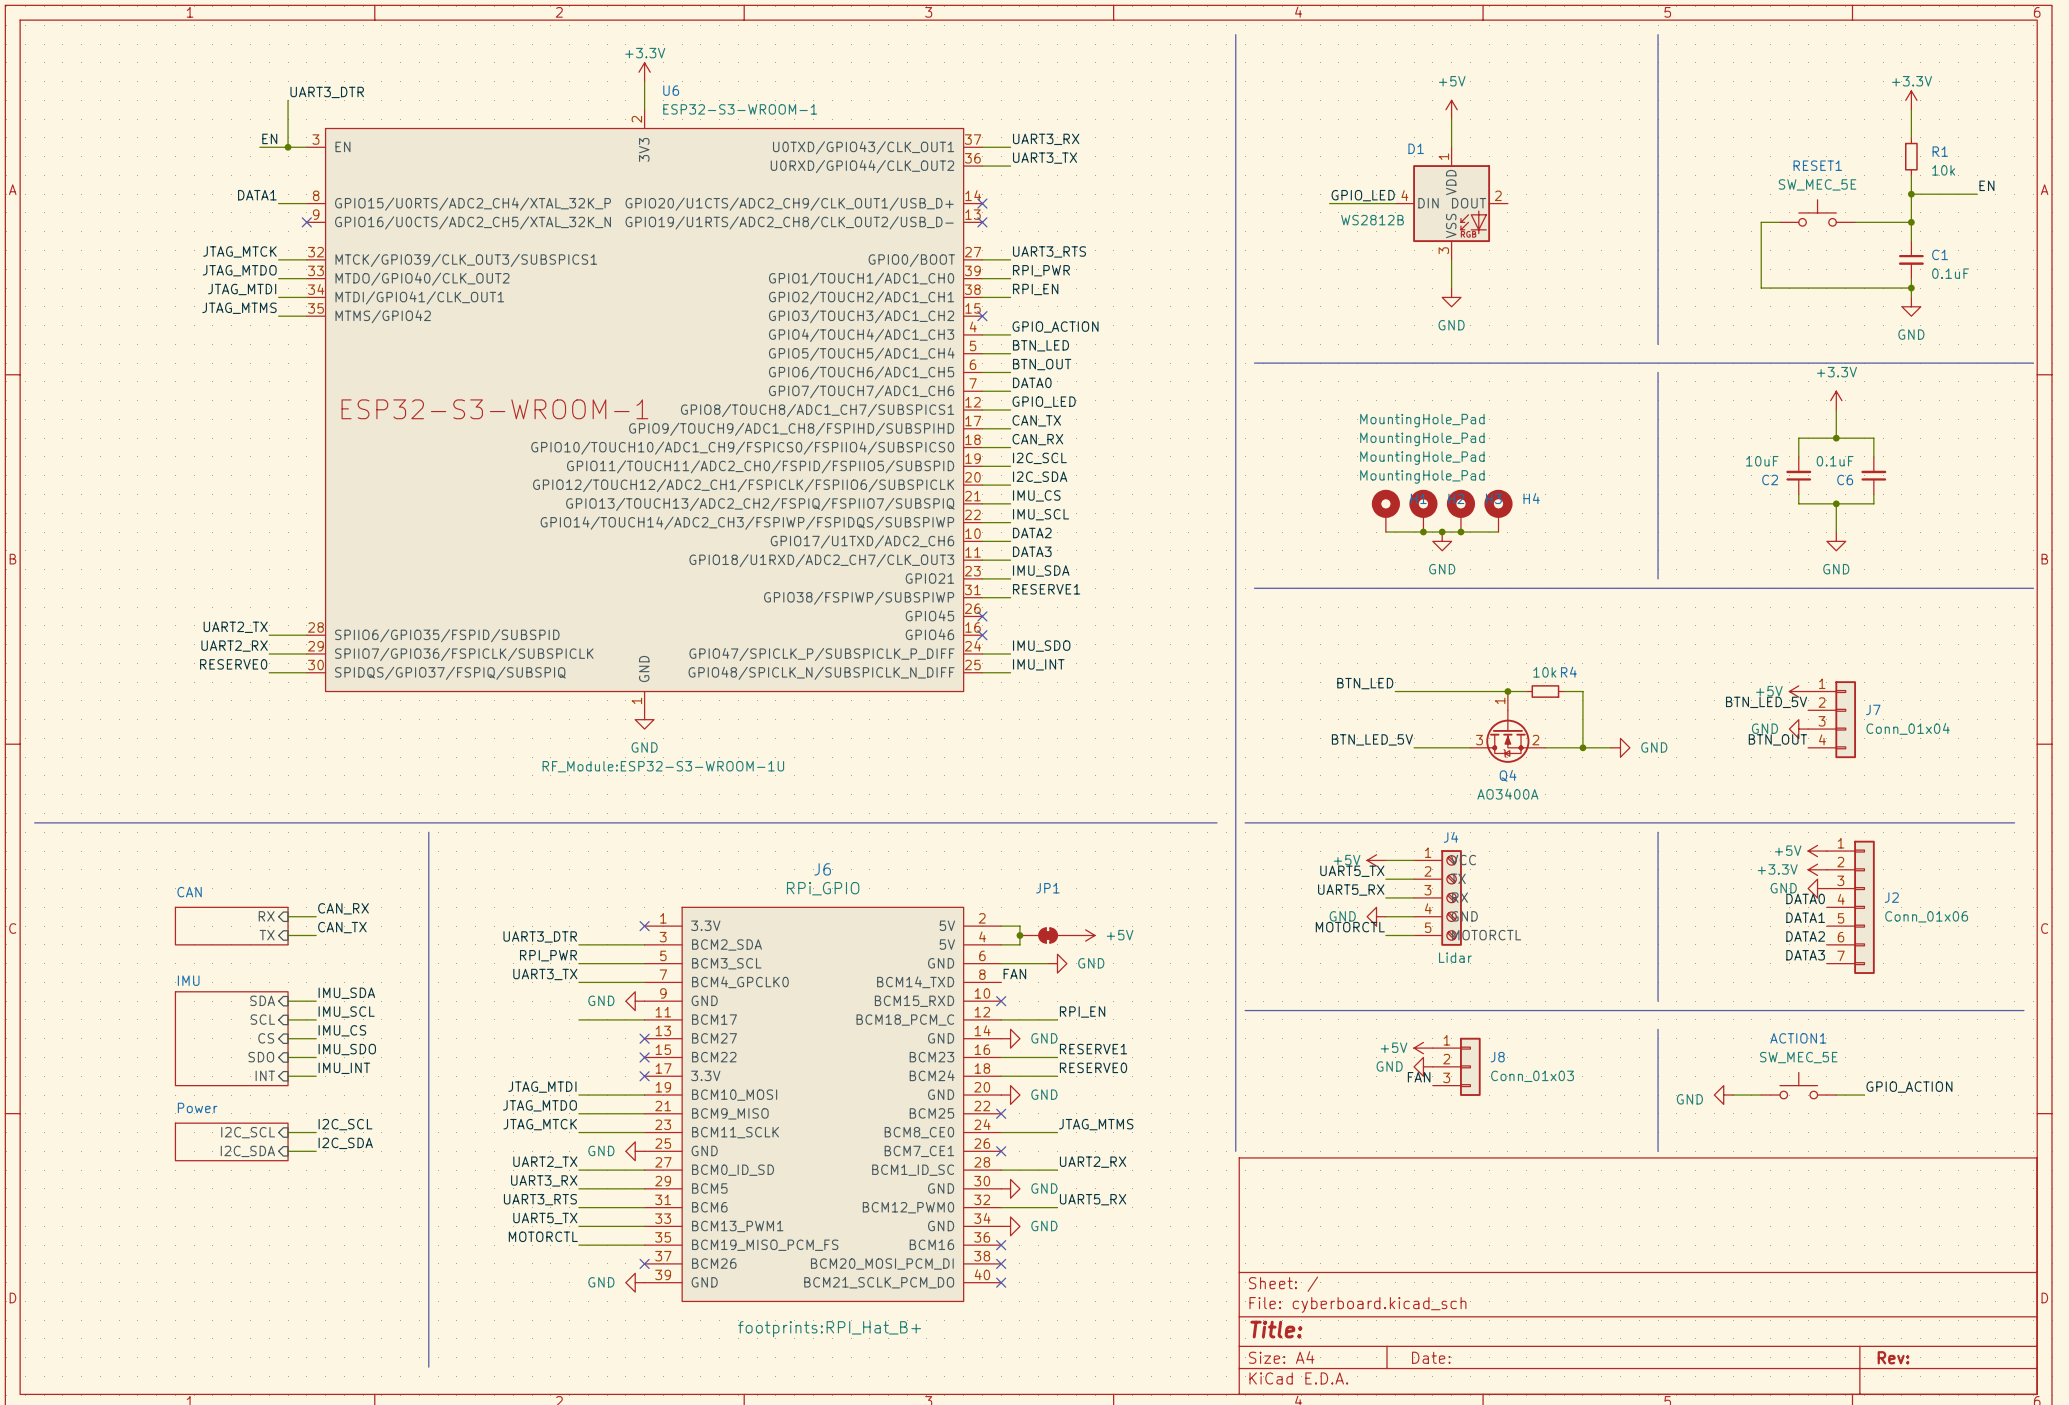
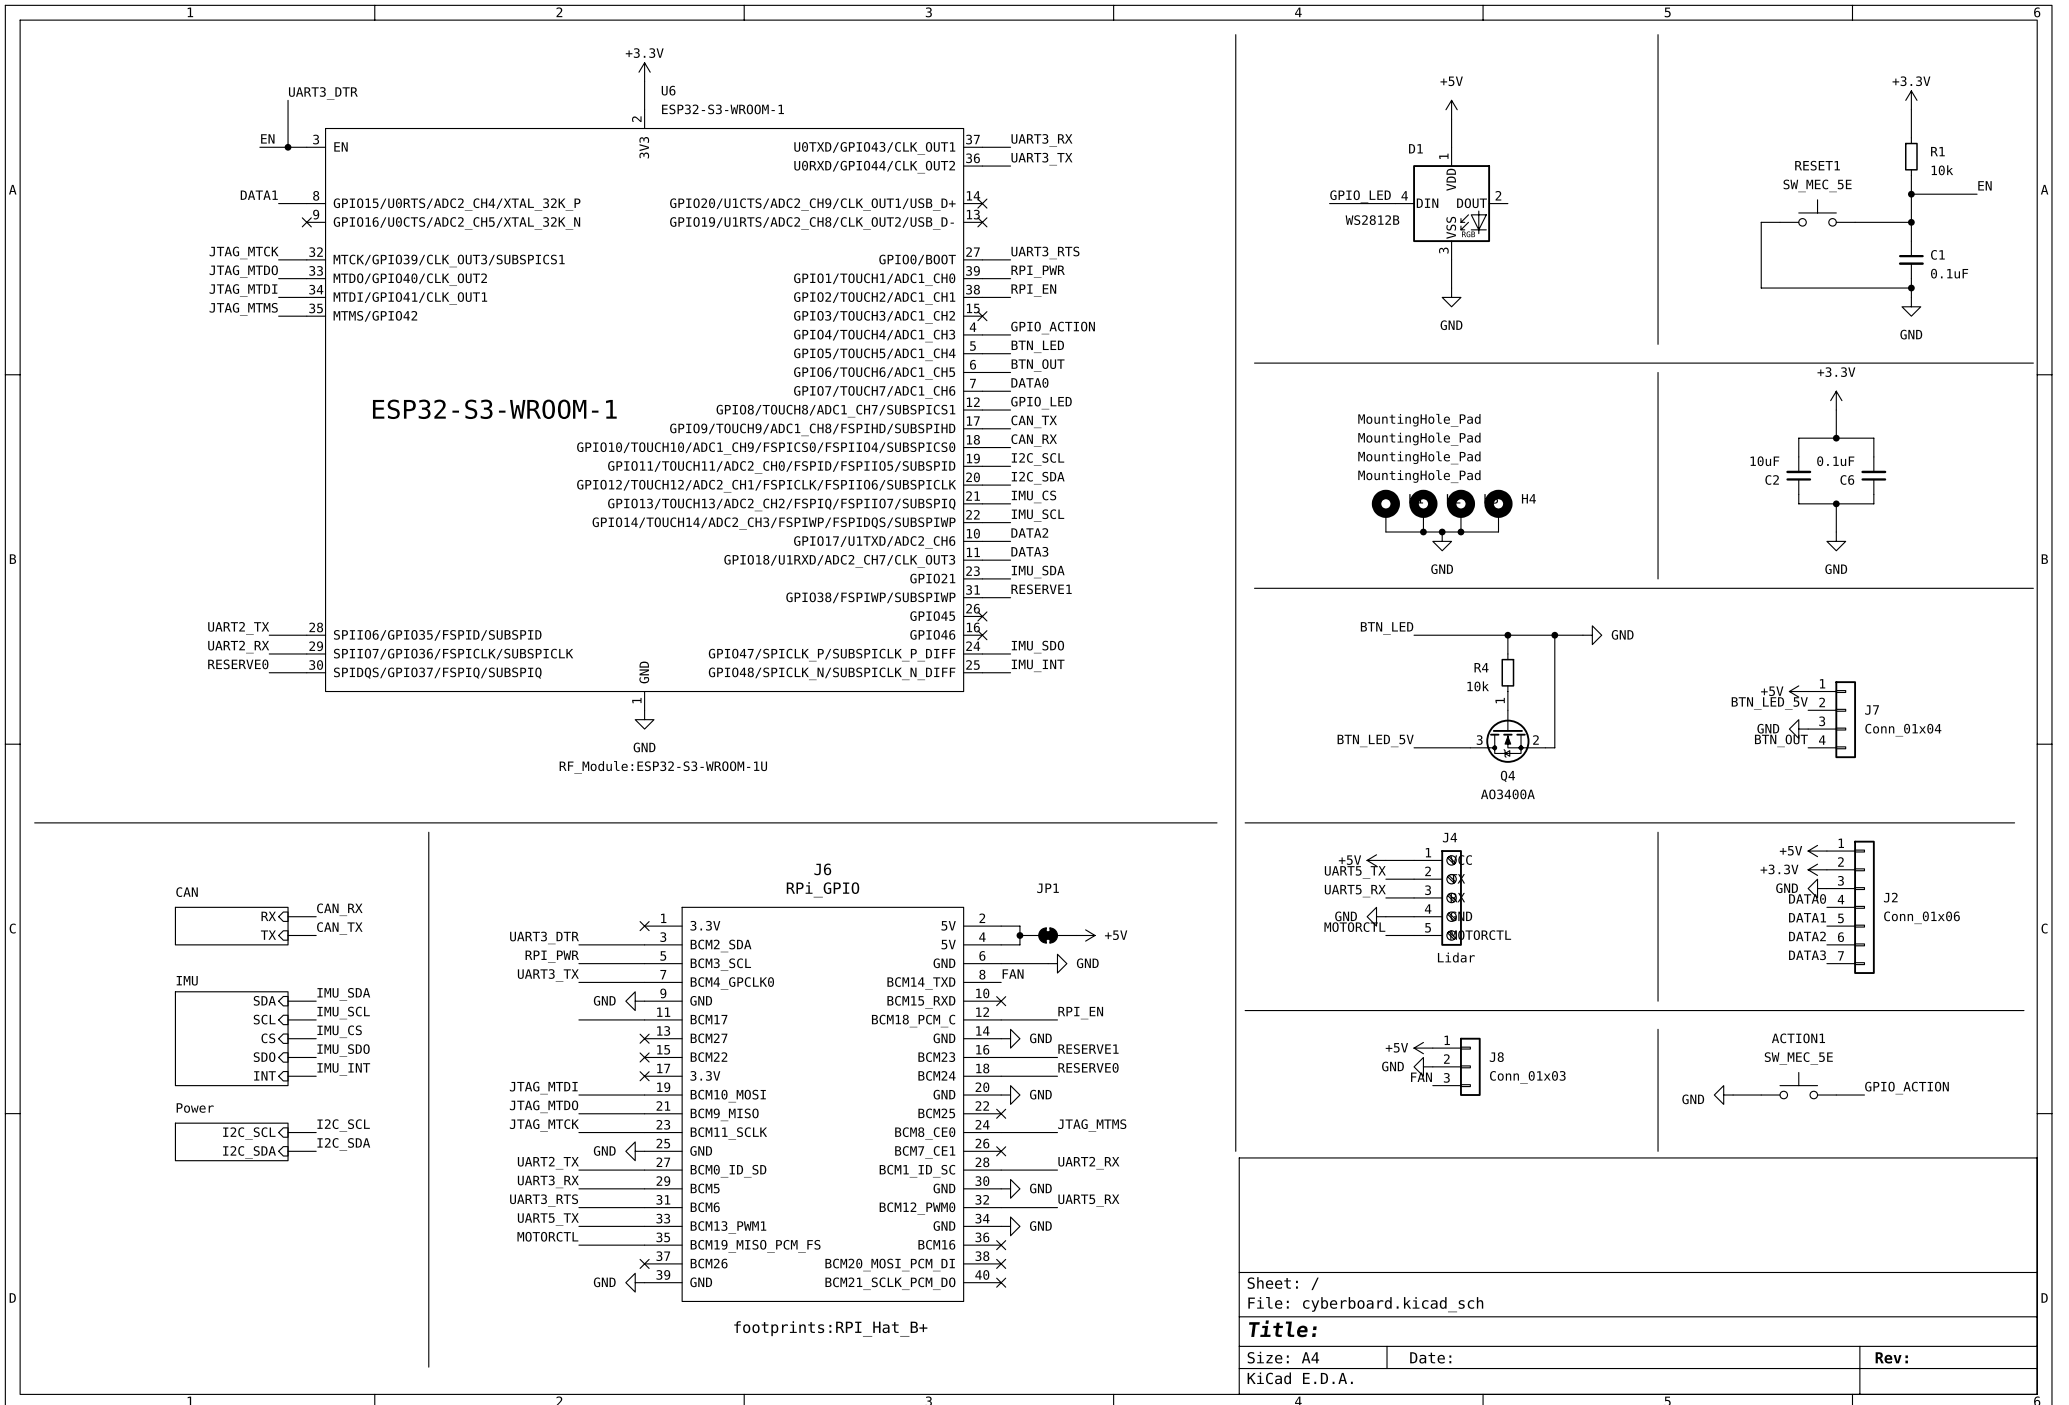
wire: none -> (1414, 635) (1582, 635)
wire: none -> (1507, 635) (1507, 653)
junction: none -> (1507, 635)
junction: none -> (1554, 635)
R4 value position: 10k (1544, 672) -> 10k (1478, 686)
R4 name position: R4 (1568, 672) -> R4 (1481, 667)
label position: BTN_LED (1365, 683) -> BTN_LED (1387, 628)
wire: (1395, 691) (1526, 691) -> none
junction: (1507, 691) -> none
R4 rotation: 0° (1545, 691) -> 90° clockwise (1507, 672)
R4 position: (1545, 691) -> (1507, 672)
wire: (1564, 691) (1582, 691) (1582, 747) -> none
wire: (1554, 747) (1611, 747) -> (1554, 747) (1554, 635)
junction: (1582, 747) -> none
power symbol position: GND (1620, 747) -> GND (1592, 635)

